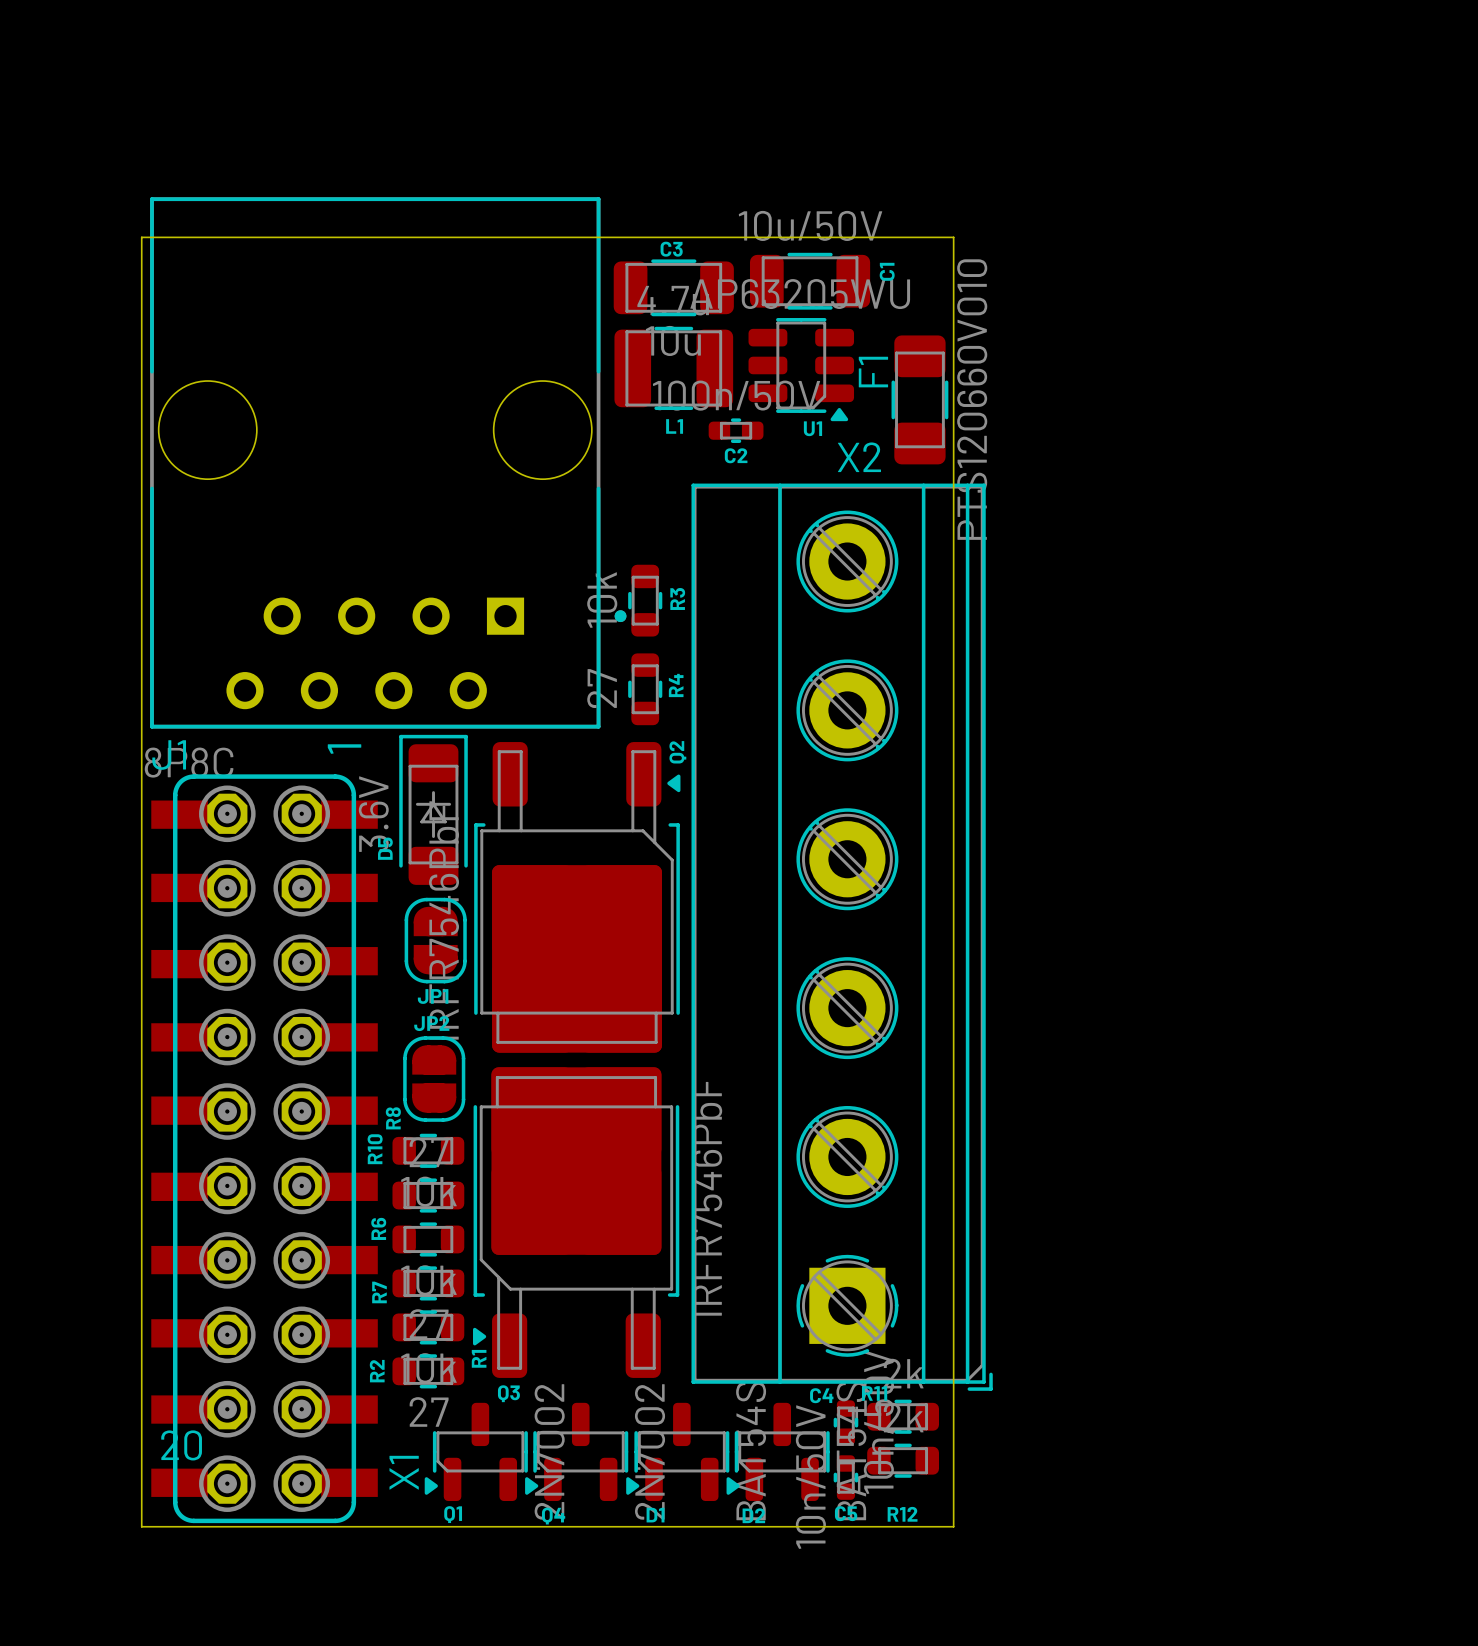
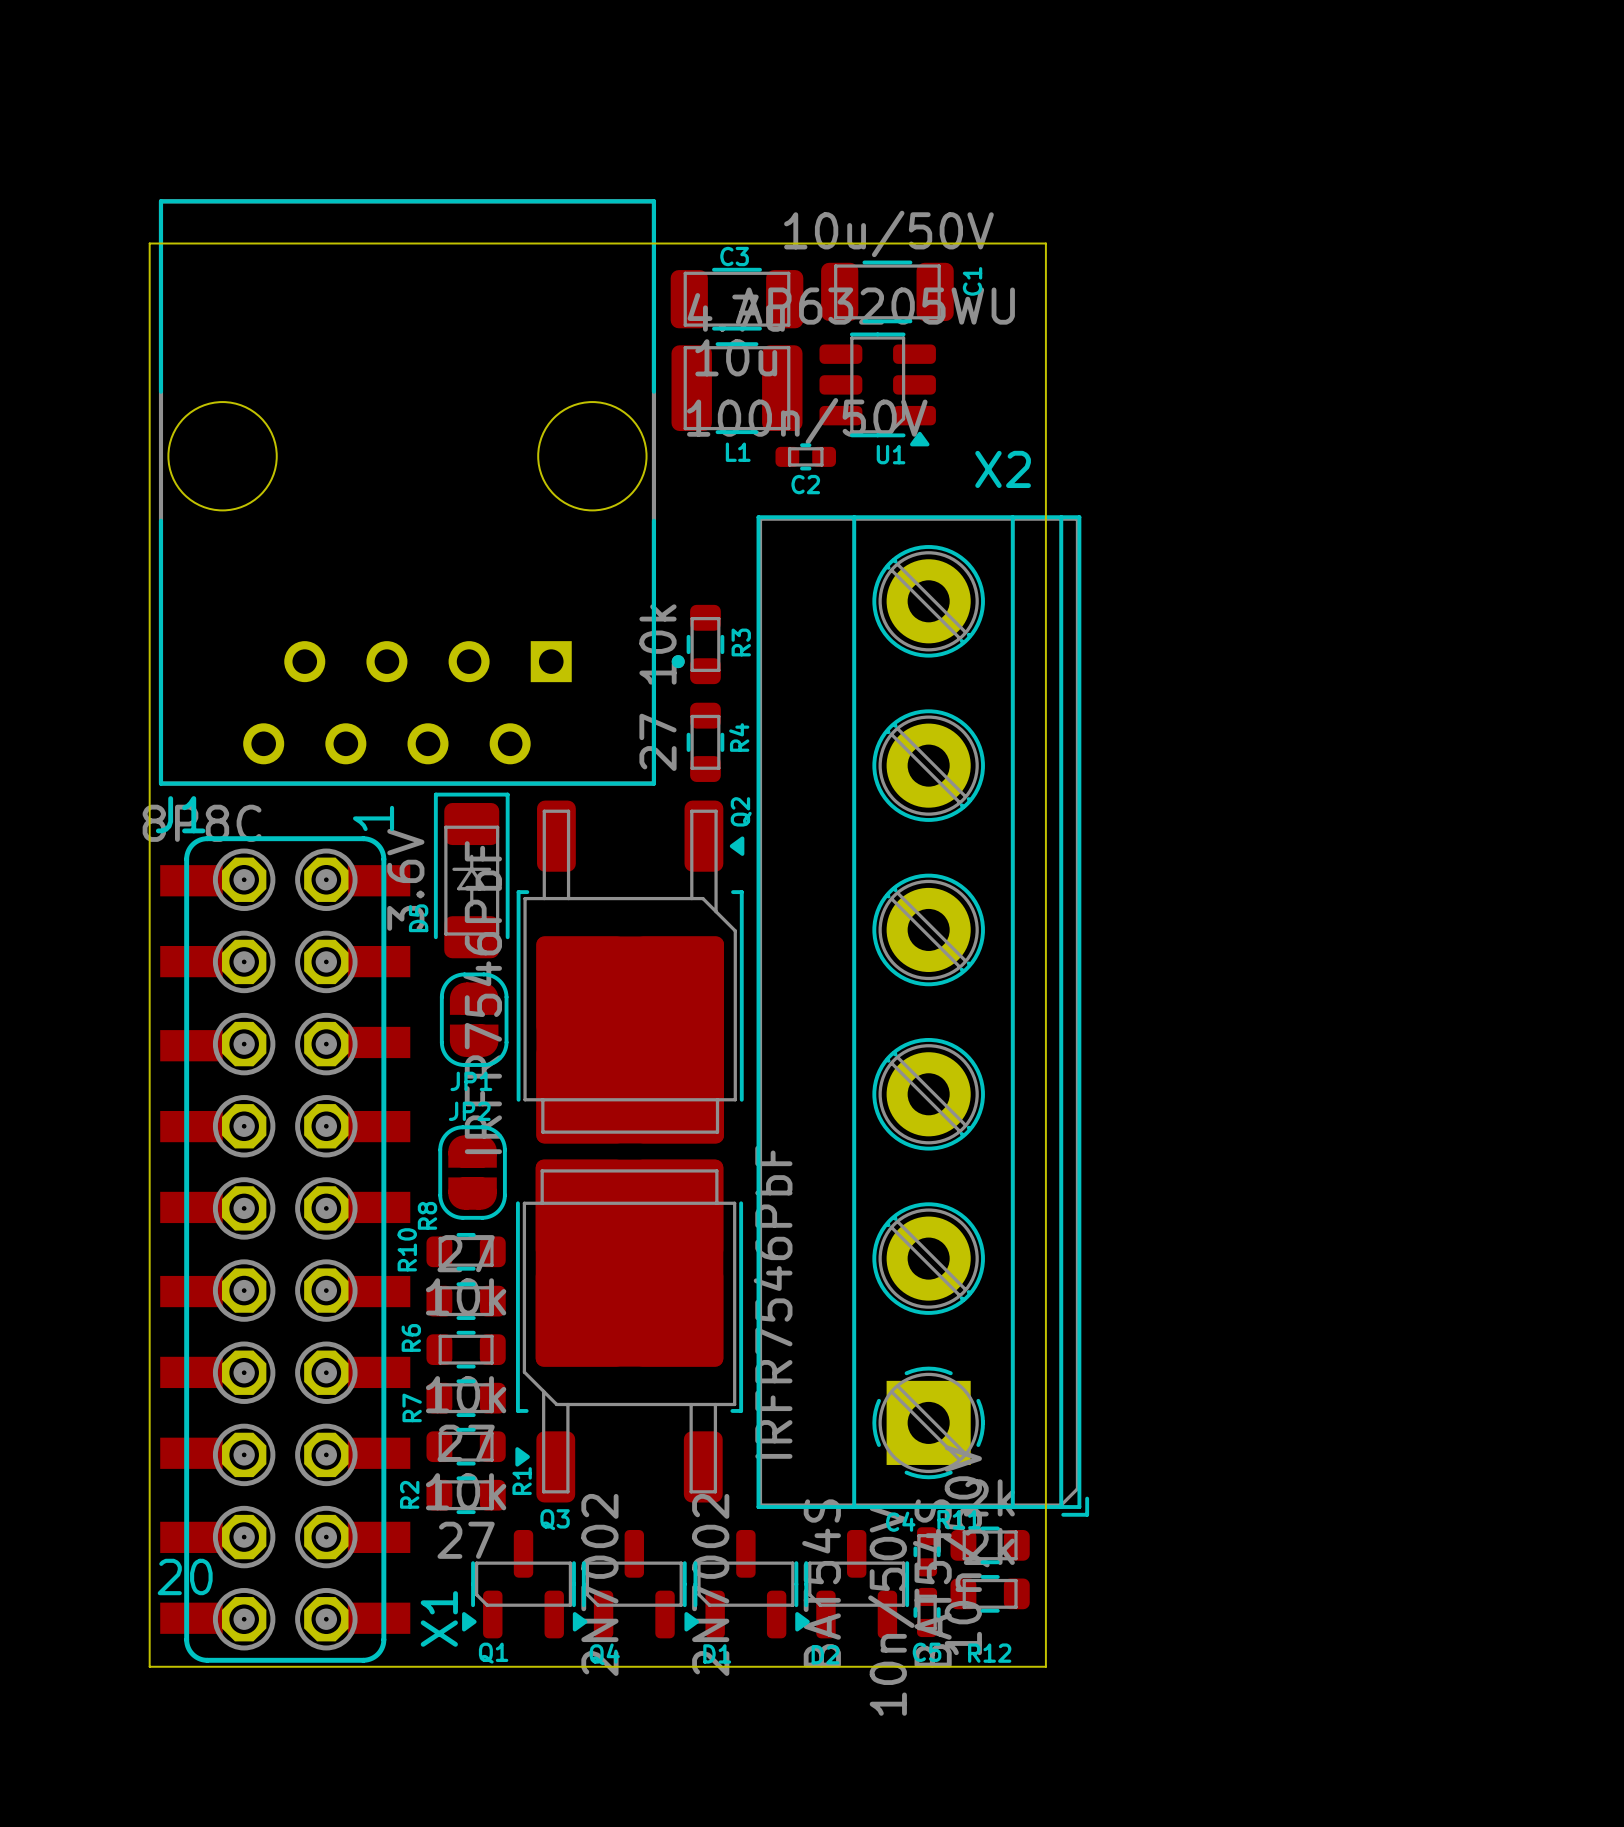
F1: PTS120660V010 (919, 399) -> none
X2 name position: X2 (859, 457) -> X2 (1003, 469)

